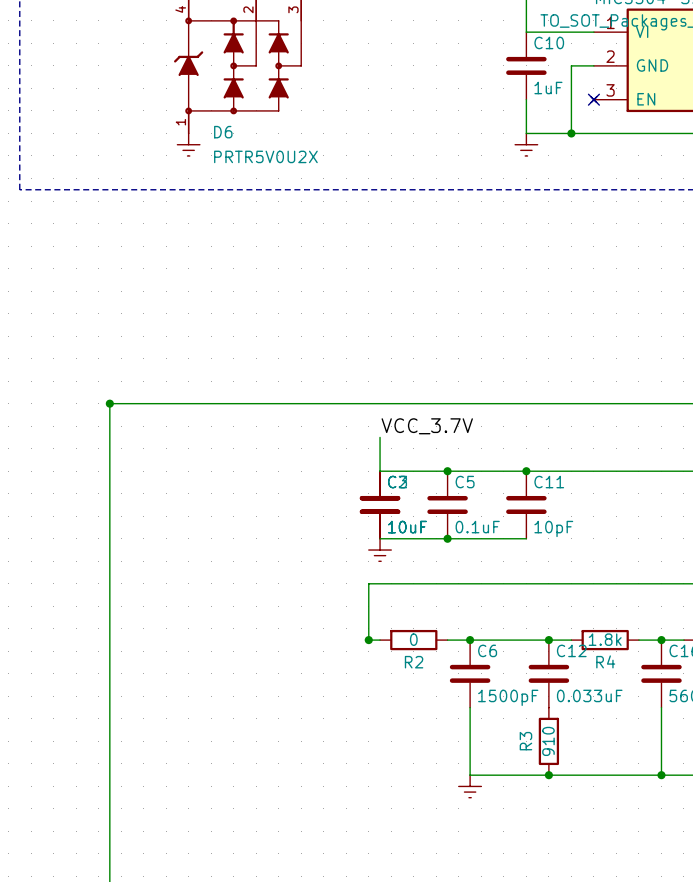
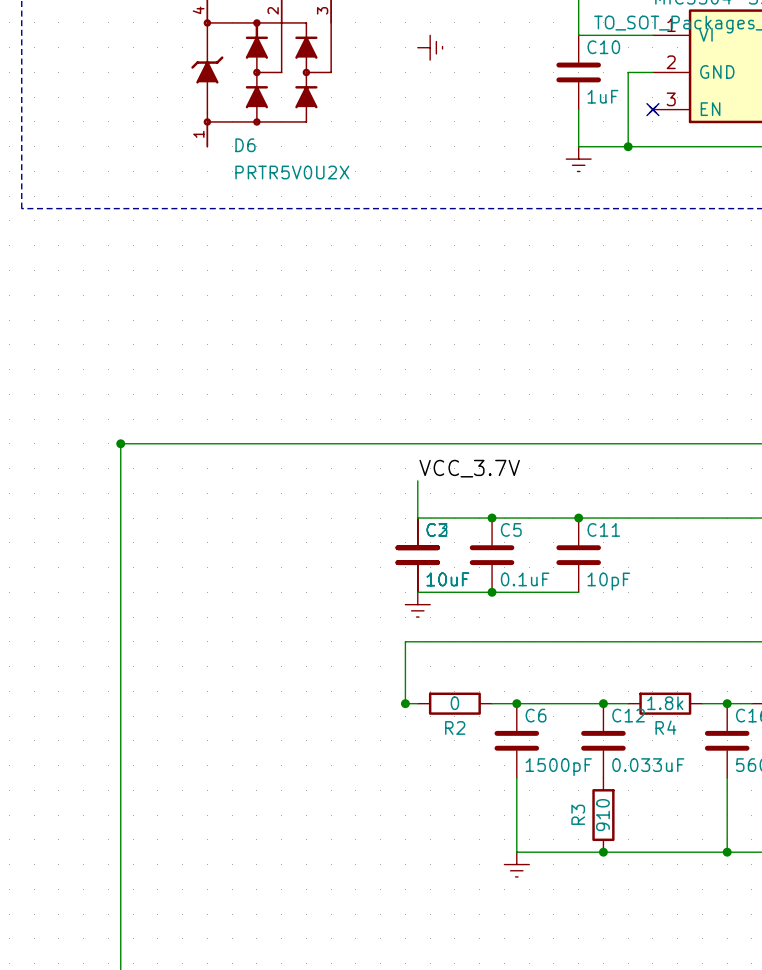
power symbol: none -> (430, 47)
power symbol: (188, 144) -> none

